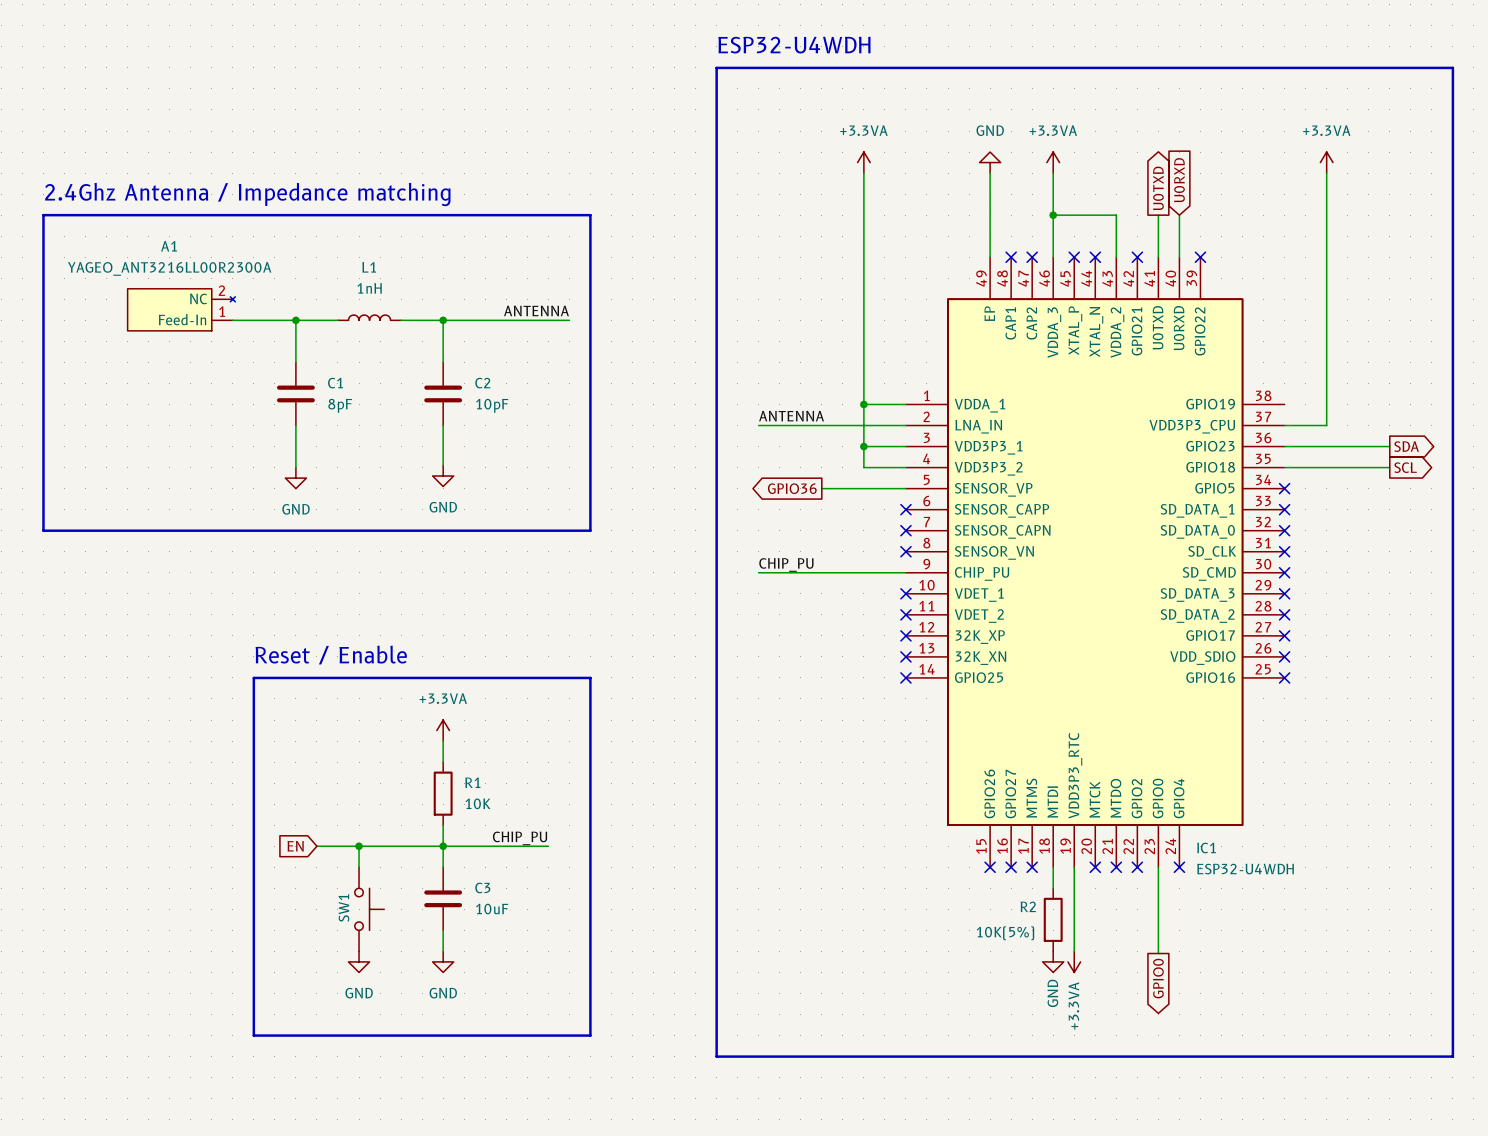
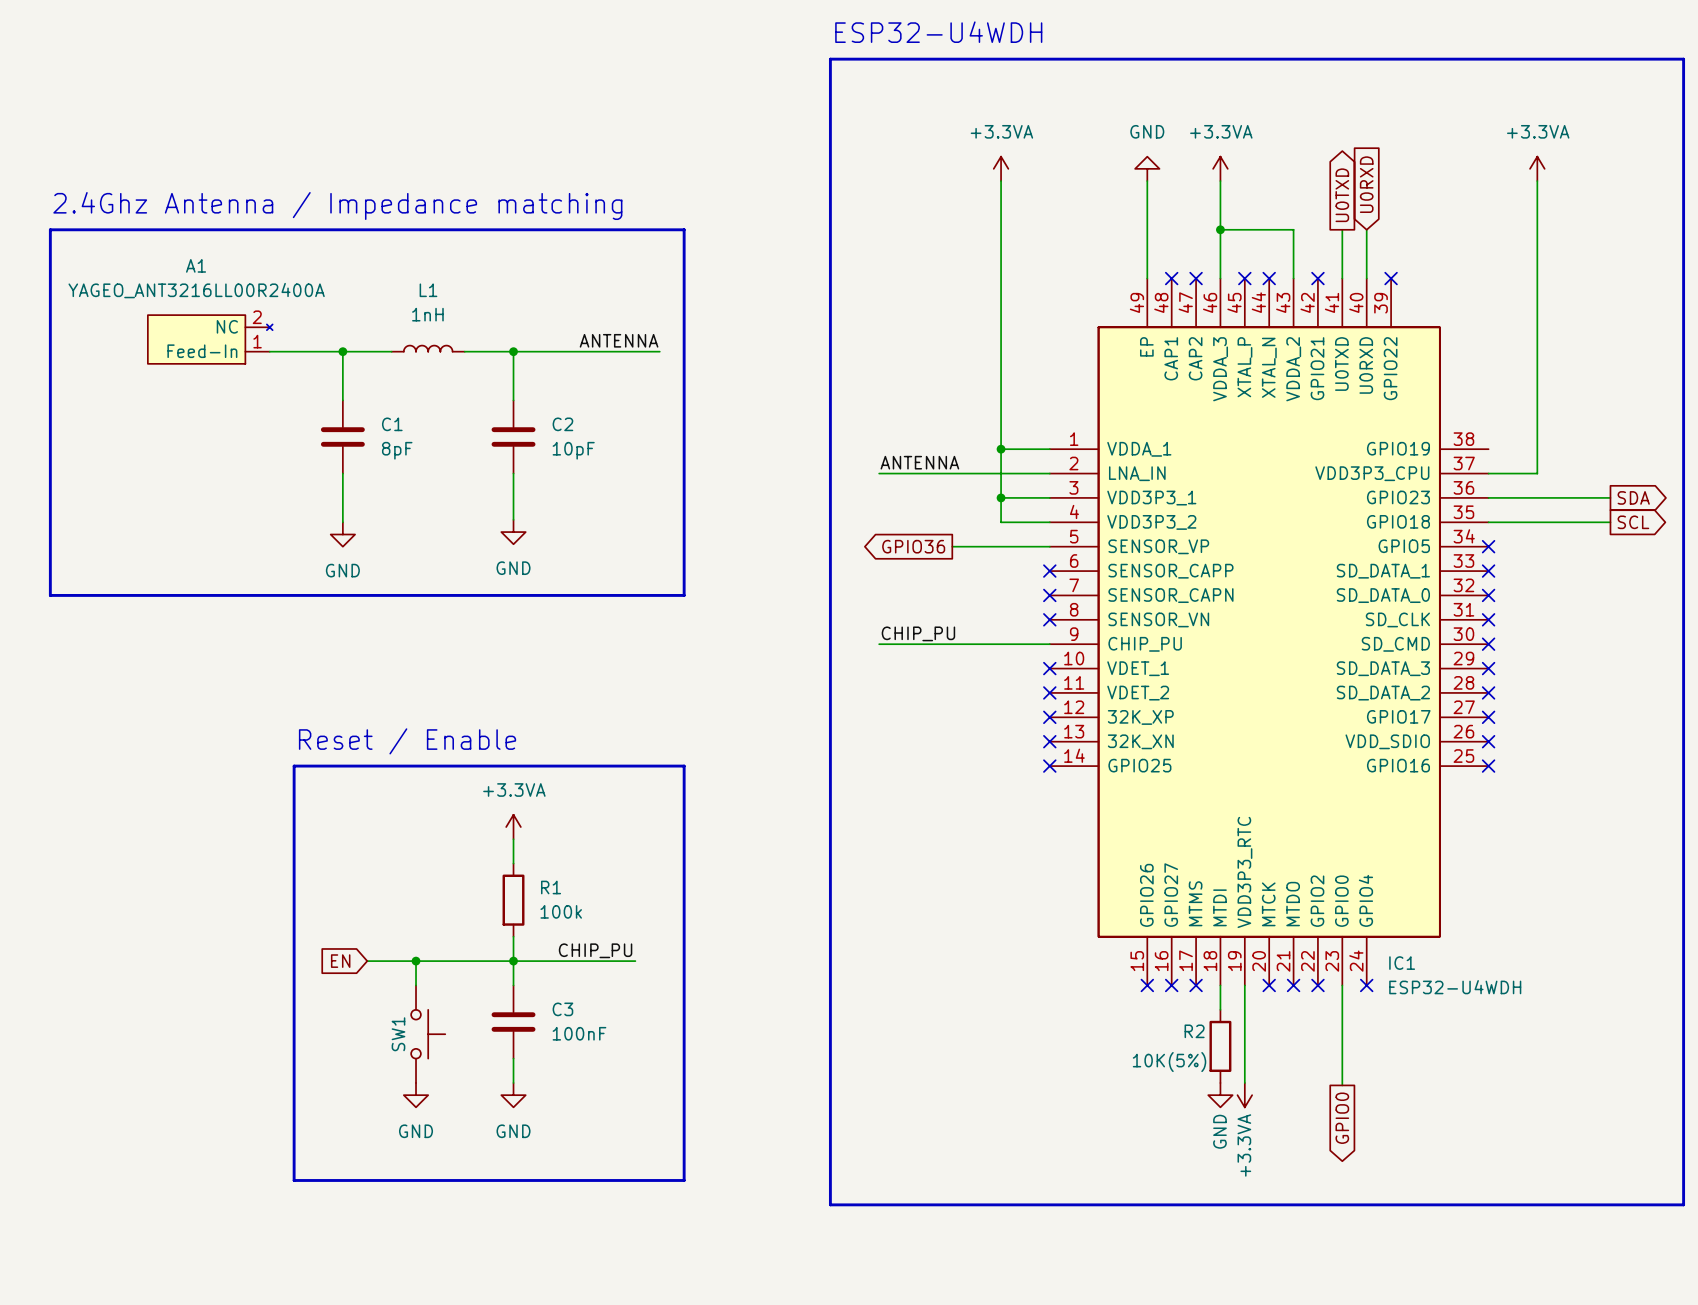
A1 value: YAGEO_ANT3216LL00R2300A (169, 268) -> YAGEO_ANT3216LL00R2400A (196, 290)
R1 value: 10K (477, 803) -> 100k (561, 911)
C3 value: 10uF (492, 909) -> 100nF (579, 1033)

